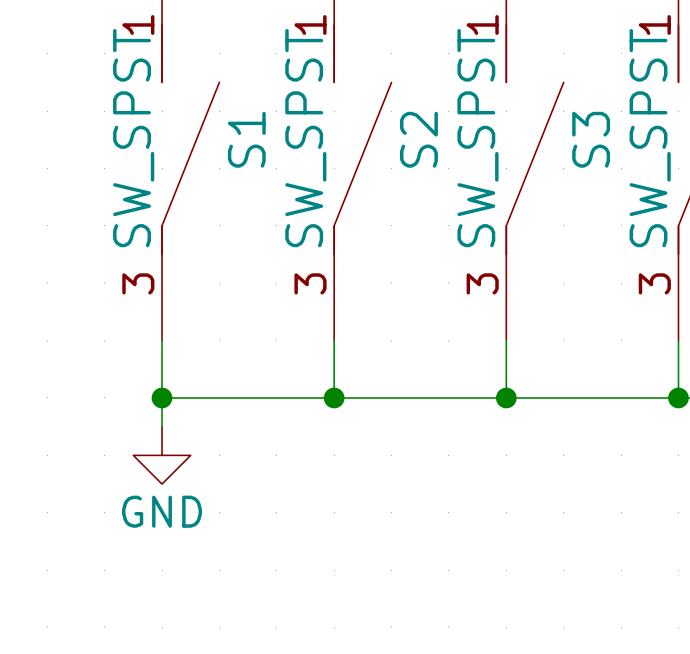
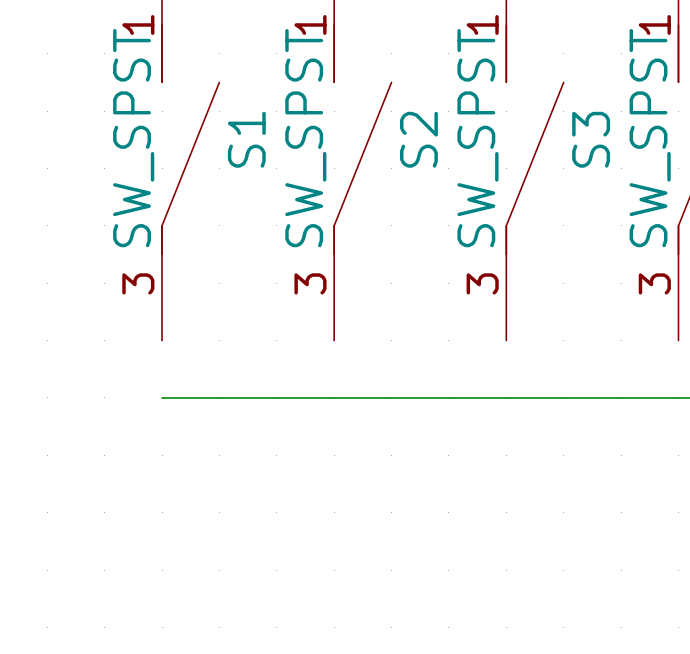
wire: (162, 340) (162, 426) -> none
wire: (334, 340) (334, 397) -> none
wire: (506, 340) (506, 397) -> none
wire: (678, 340) (678, 397) -> none
junction: (162, 397) -> none
junction: (334, 397) -> none
junction: (506, 397) -> none
junction: (678, 397) -> none
power symbol: GND (162, 455) -> none

